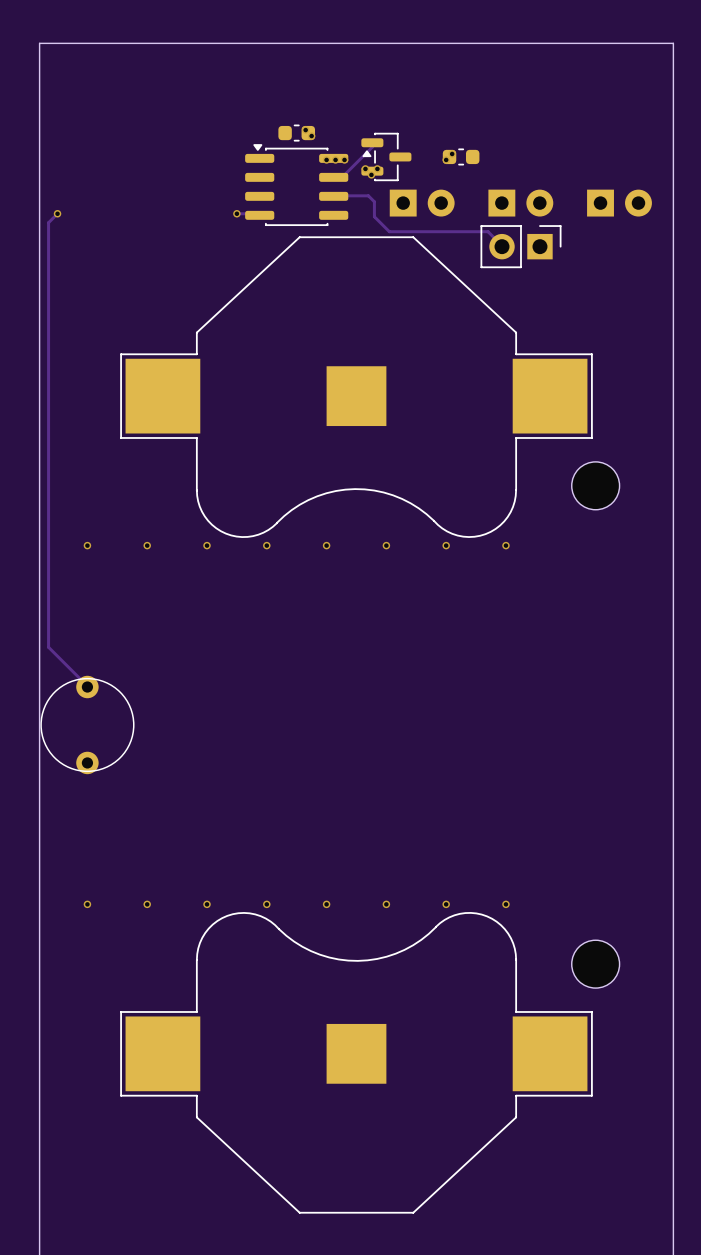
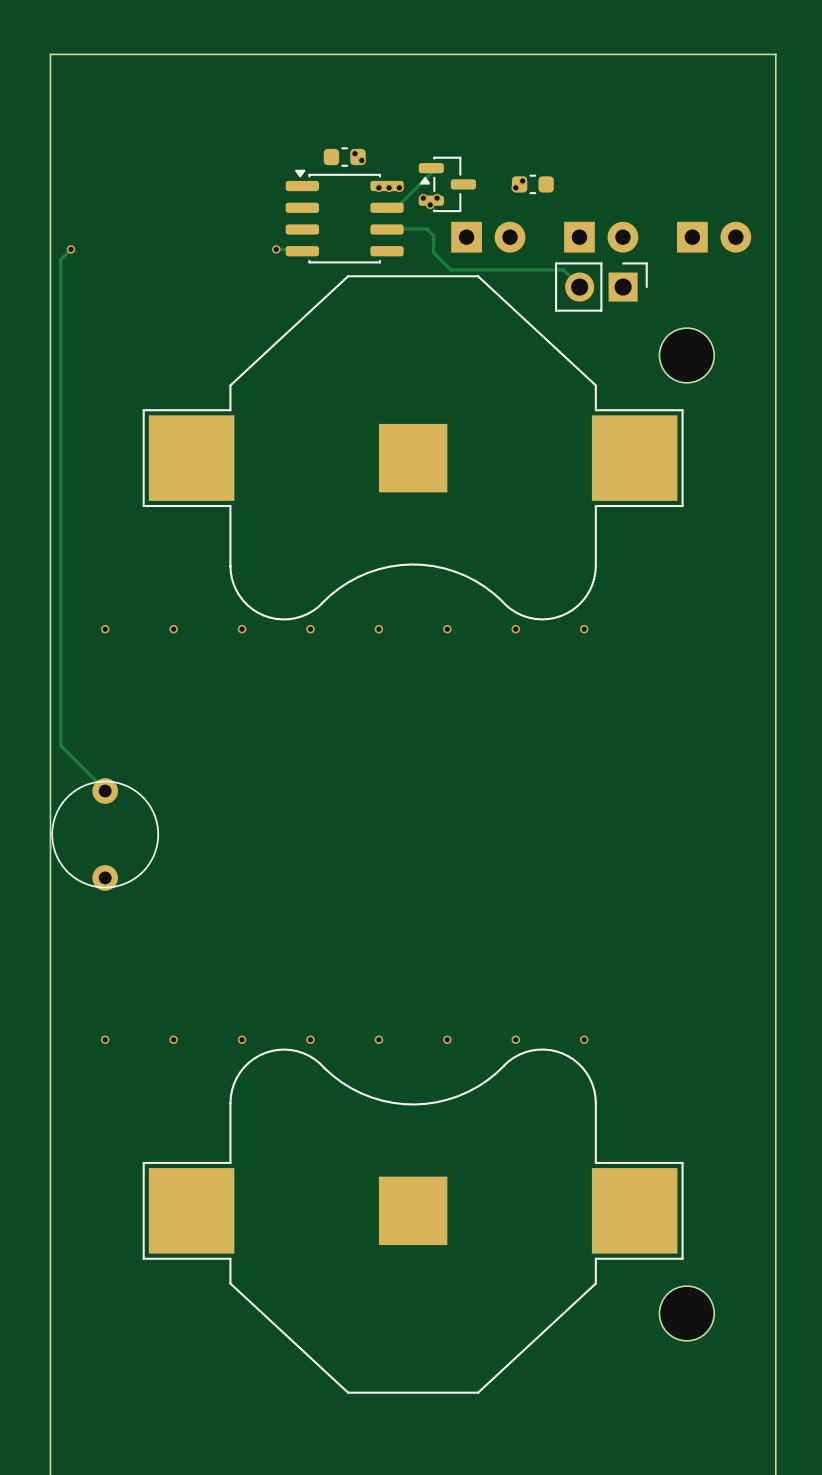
part position: (595, 485) -> (686, 355)
part position: (595, 964) -> (686, 1313)

